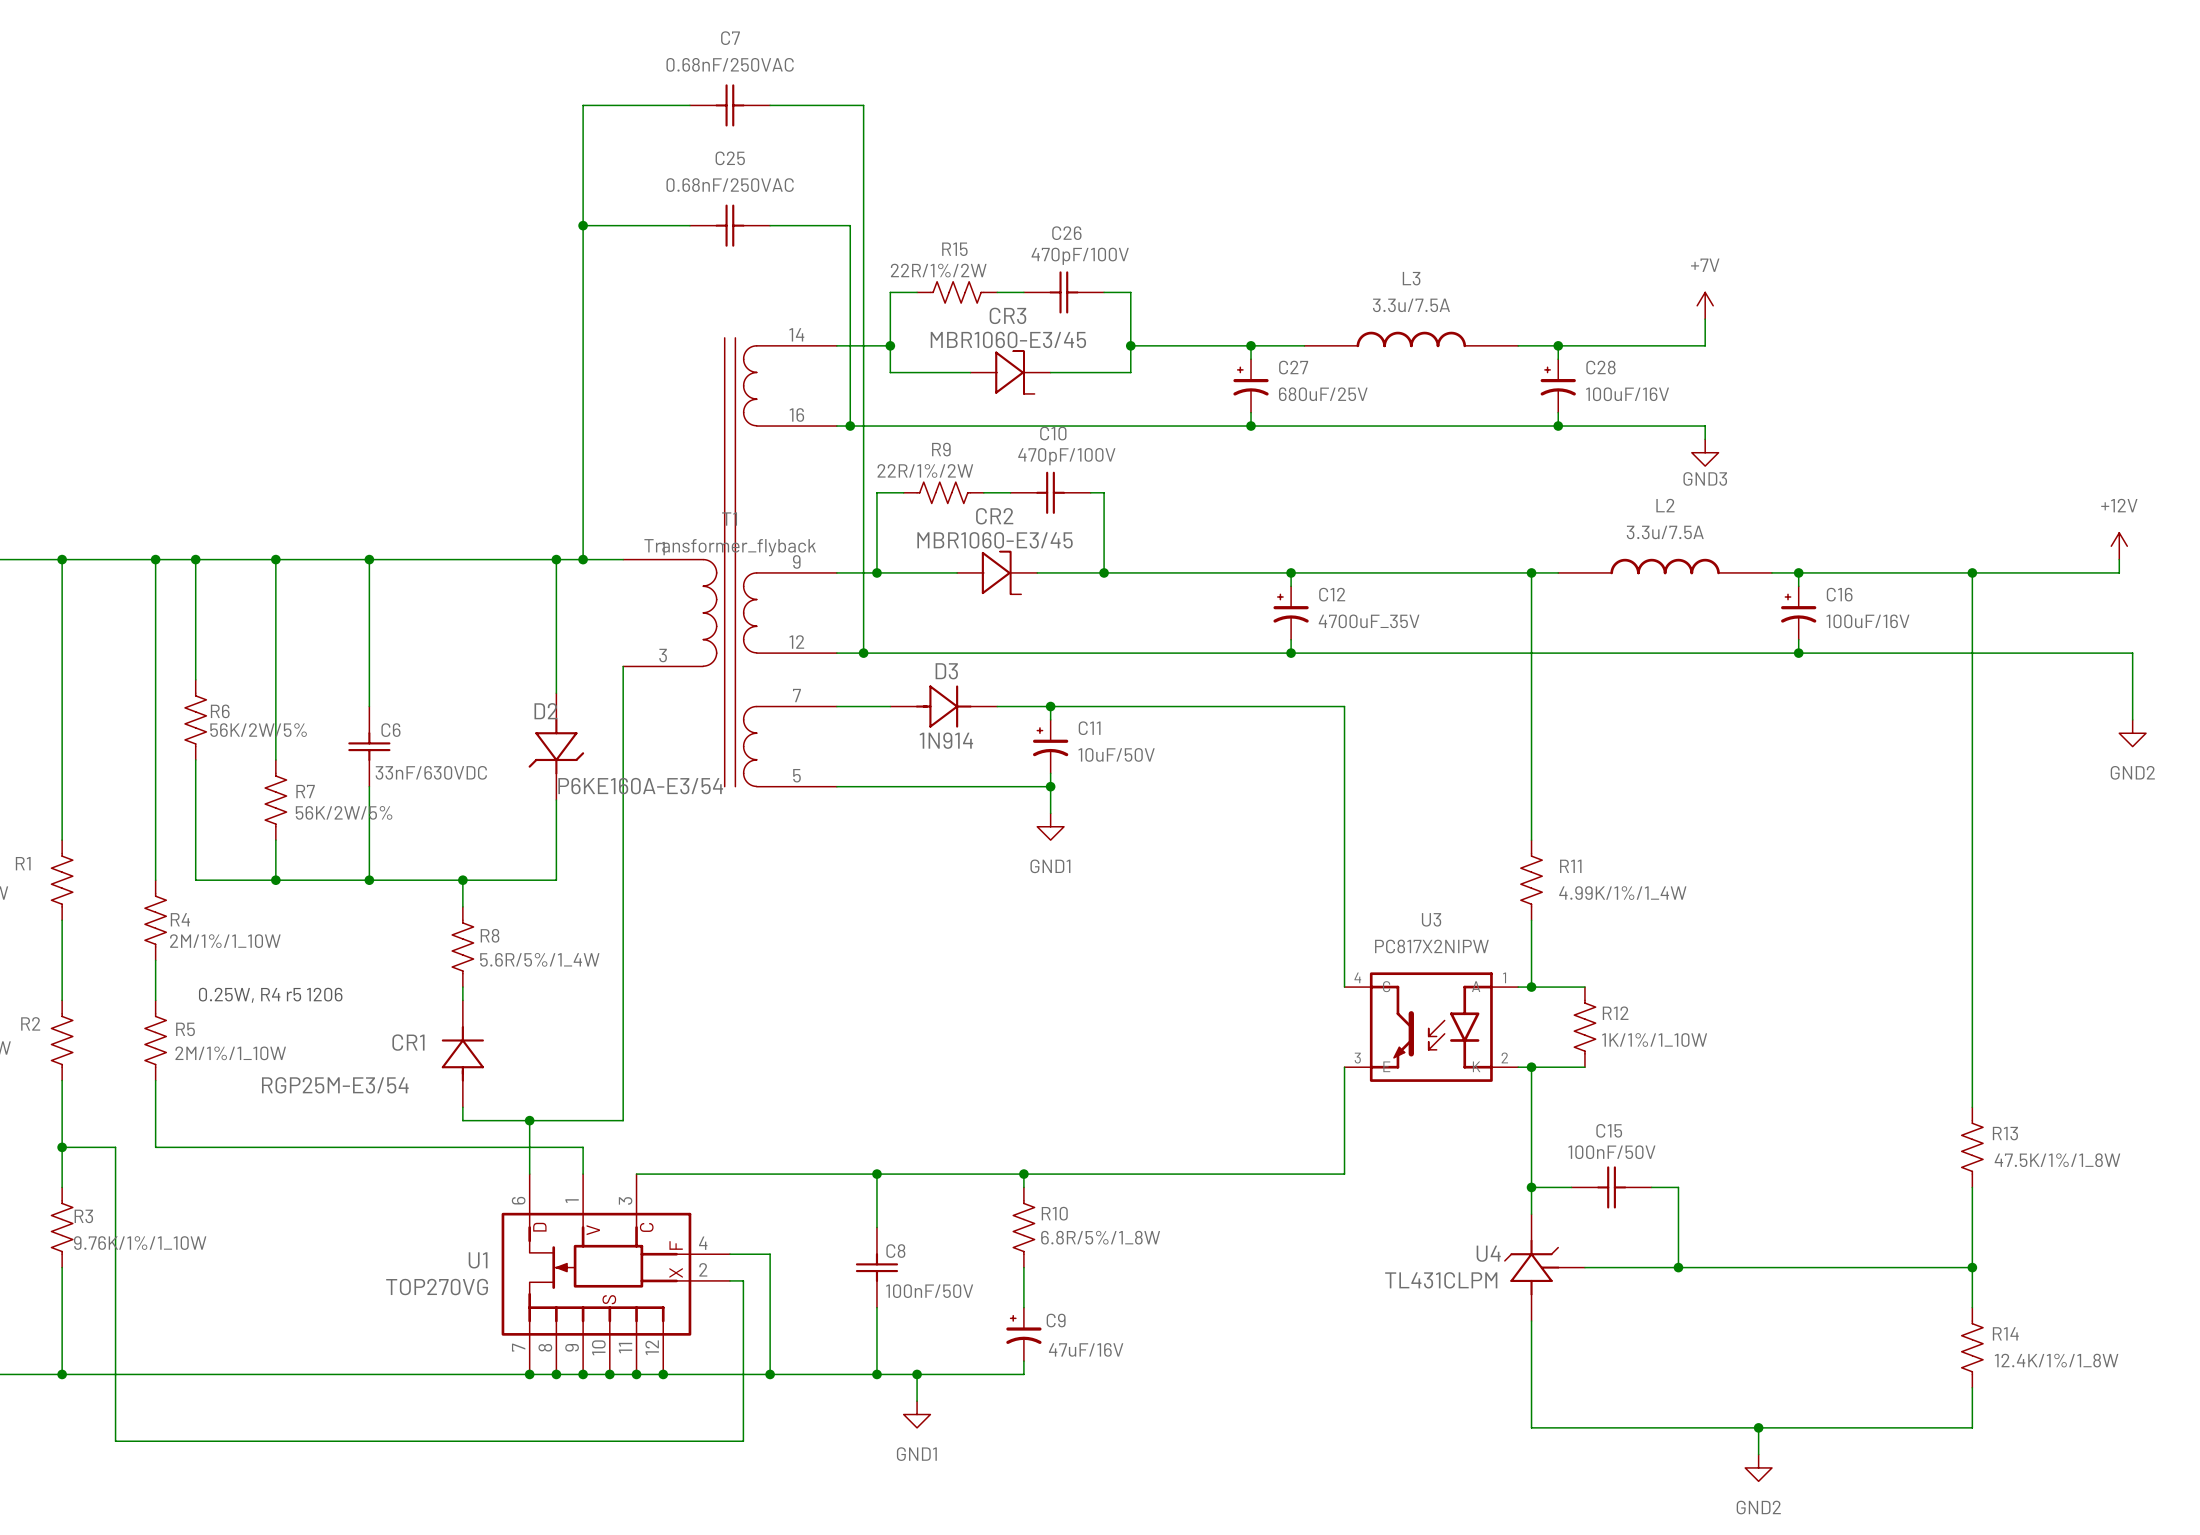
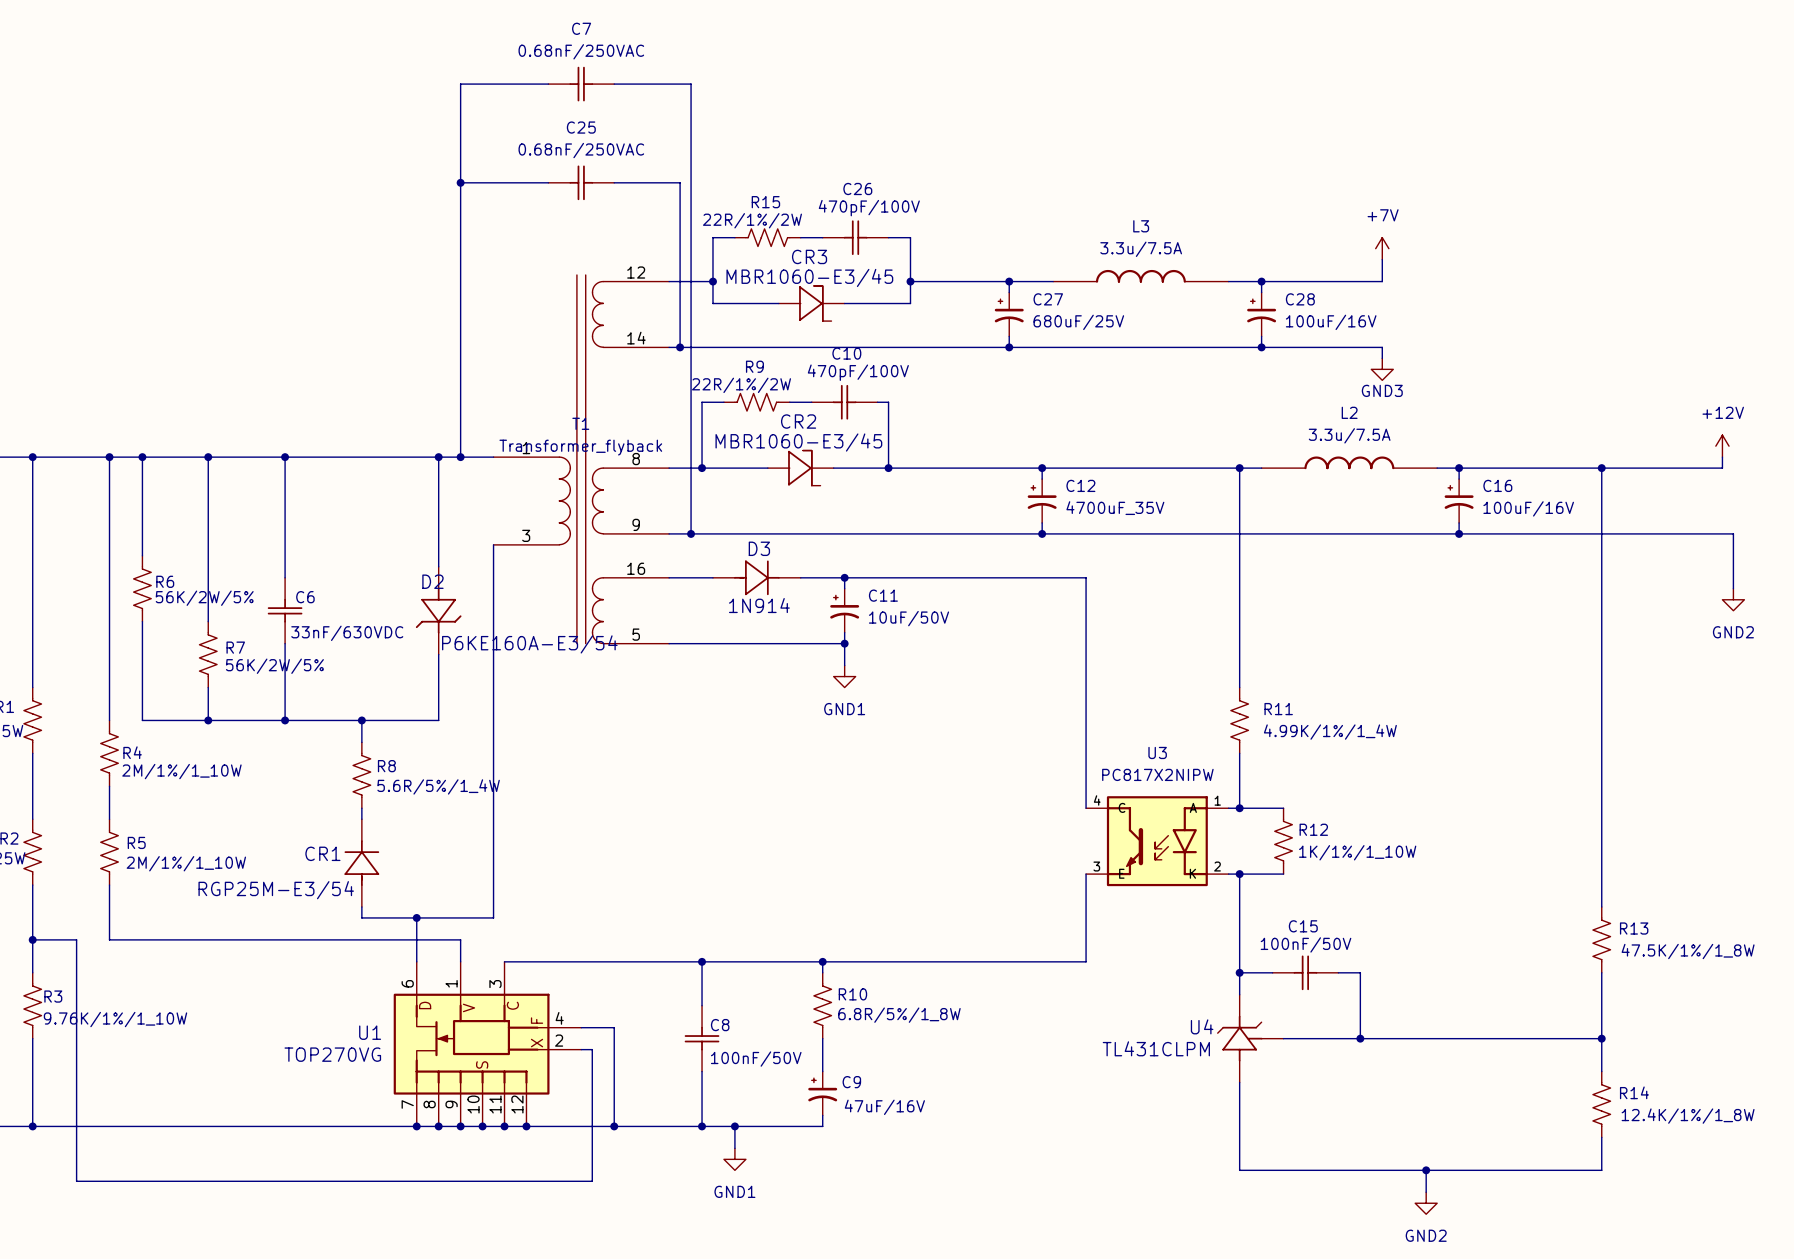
T1 pin number: 14 (796, 334) -> 12 (636, 272)
T1 pin number: 16 (796, 414) -> 14 (636, 338)
T1 pin number: 9 (796, 561) -> 8 (636, 459)
T1 pin number: 12 (796, 642) -> 9 (636, 524)
T1 pin number: 7 (796, 695) -> 16 (636, 568)
text: 0.25W, R4 r5 1206 (270, 995) -> none

